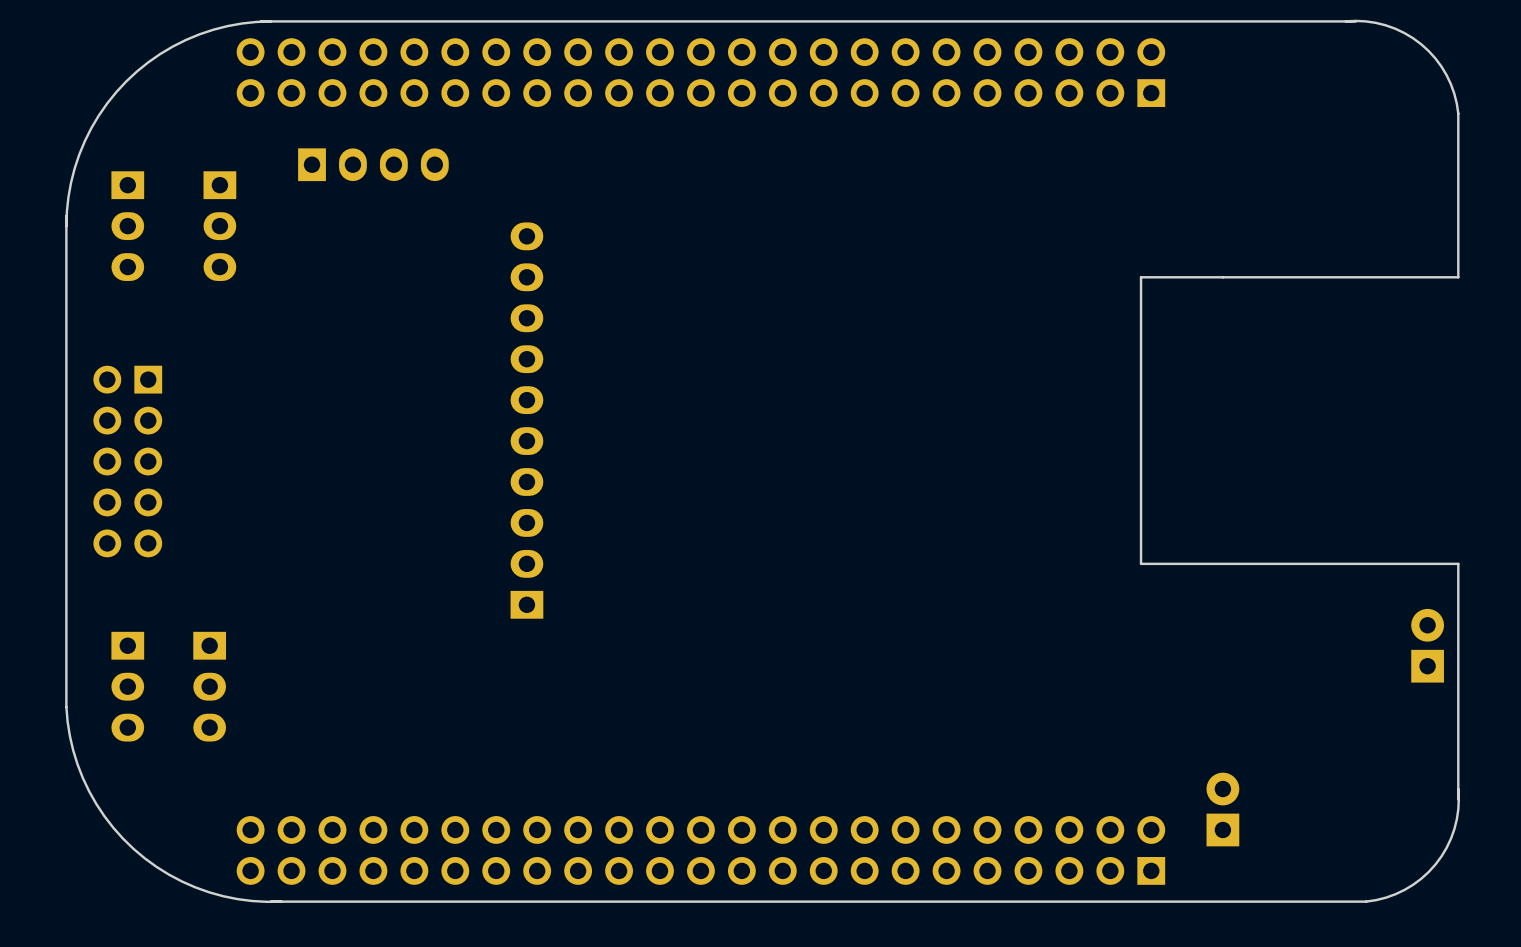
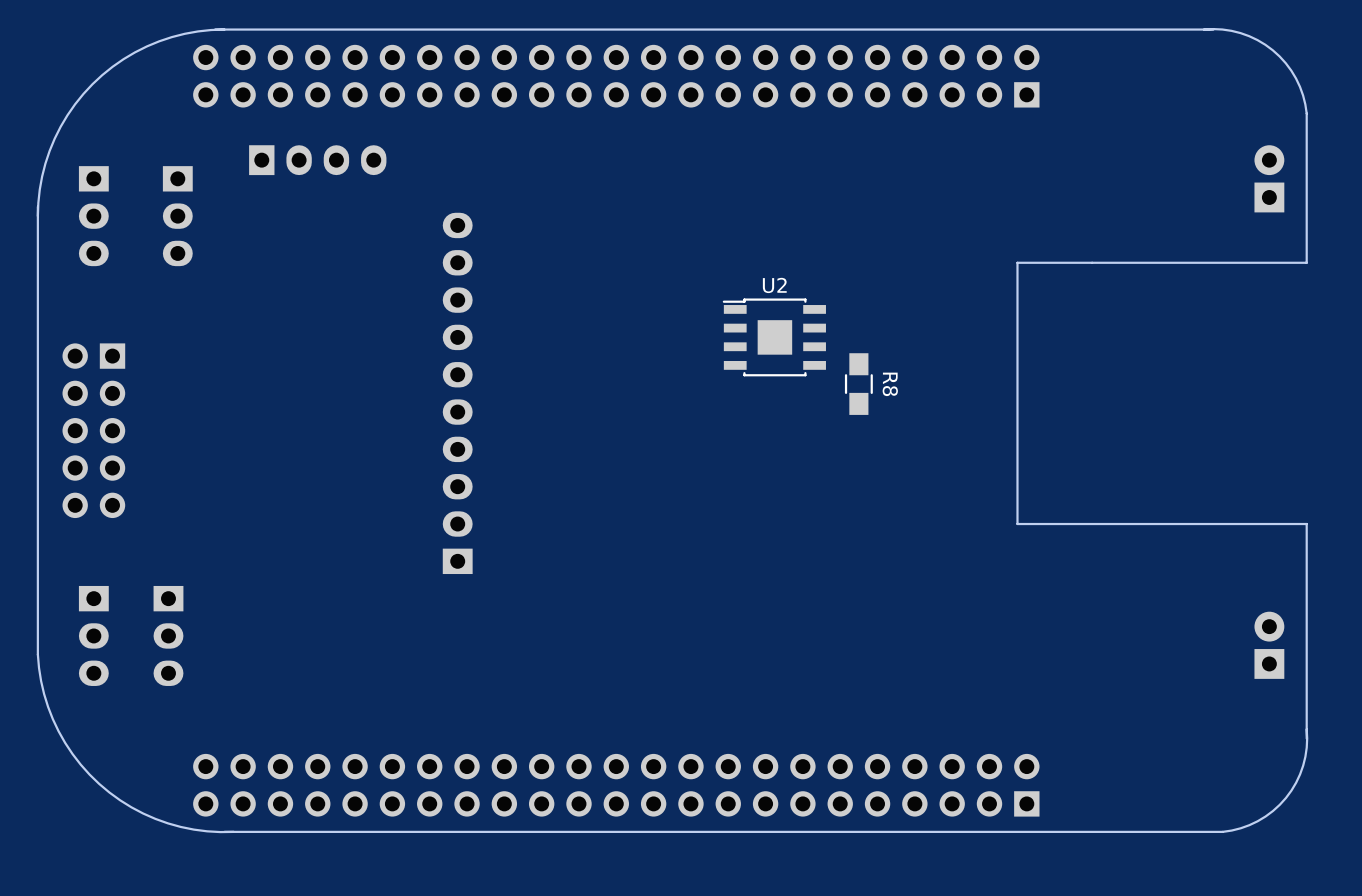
part: none -> (1269, 178)
U2: none -> (774, 337)
R8: none -> (858, 384)
part position: (1427, 645) -> (1269, 645)
part: (1222, 809) -> none

